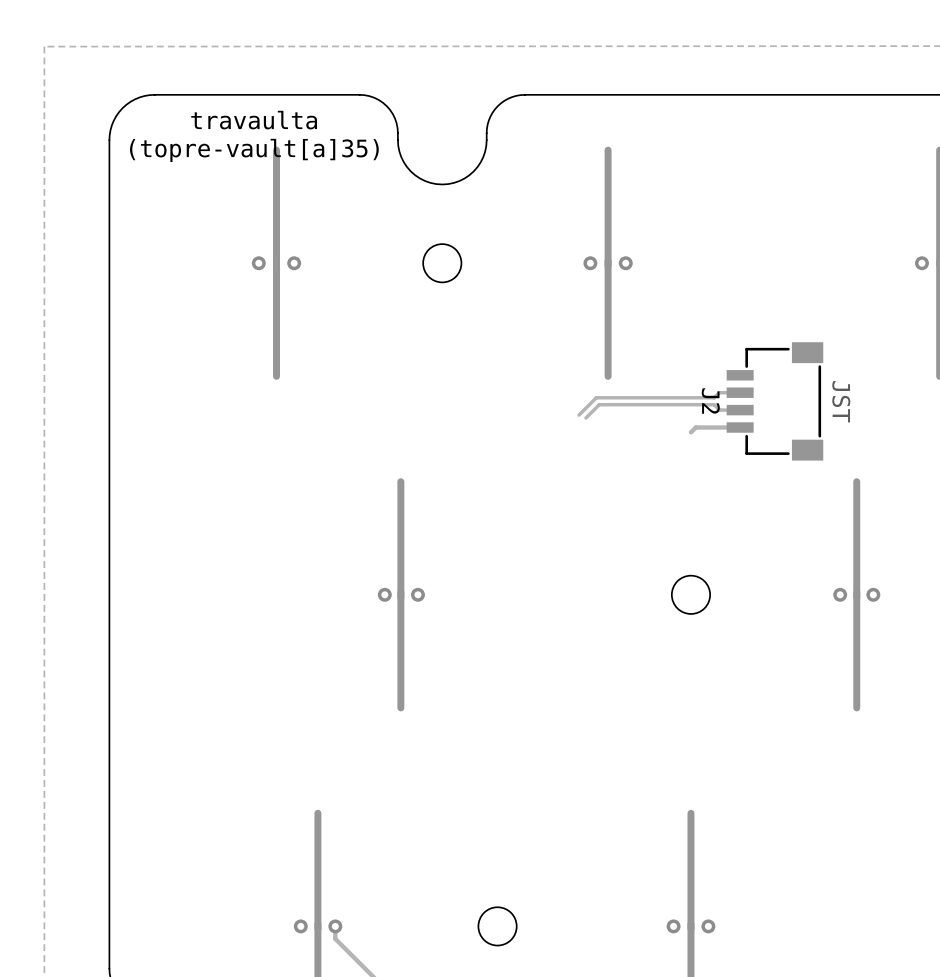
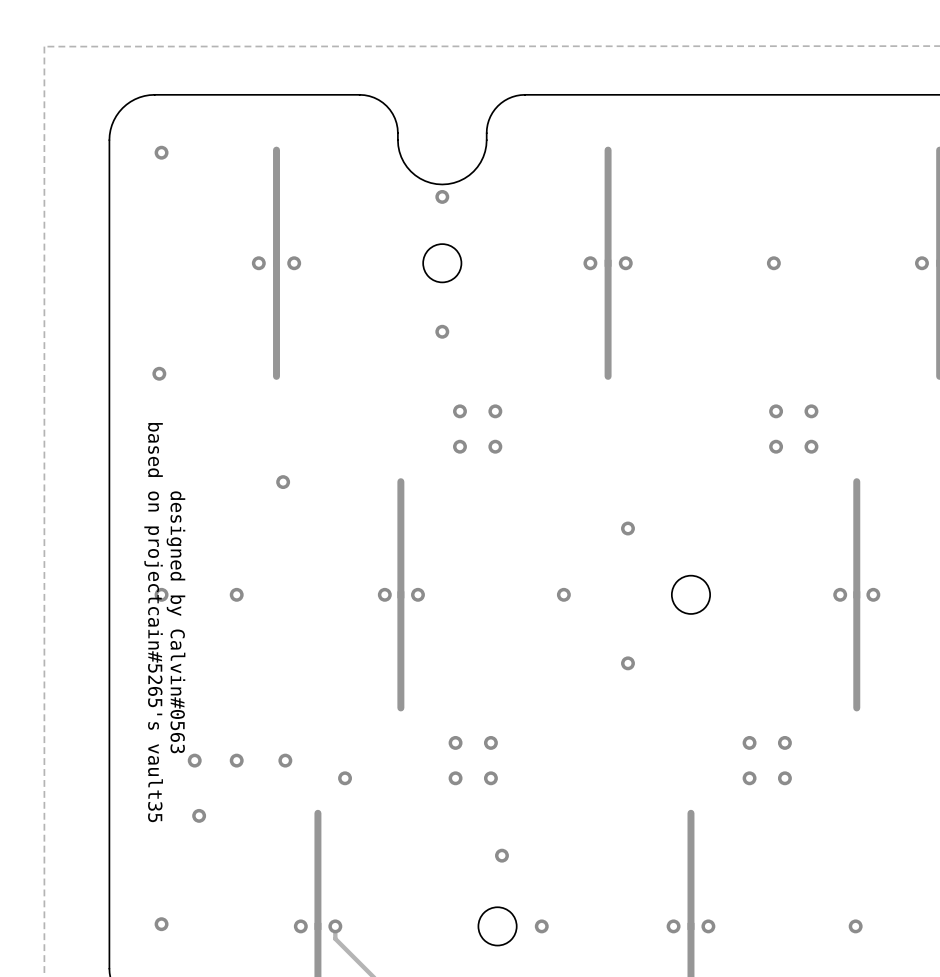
text: travaulta (254, 120) -> none
text: (topre-vault[a]35) (254, 150) -> none
via: none -> (161, 152)
via: none -> (442, 196)
via: none -> (773, 263)
via: none -> (442, 331)
via: none -> (159, 373)
track: (740, 392) (719, 392) (714, 397) (596, 397) (579, 415) -> none
J2: JST (774, 401) -> none
track: (740, 410) (719, 410) (714, 404) (599, 404) (585, 417) -> none
via: none -> (459, 411)
via: none -> (495, 411)
via: none -> (776, 411)
via: none -> (811, 411)
track: (740, 427) (695, 427) (690, 432) -> none
via: none -> (459, 446)
via: none -> (495, 446)
via: none -> (776, 446)
via: none -> (811, 446)
via: none -> (283, 482)
via: none -> (627, 528)
via: none -> (161, 594)
via: none -> (236, 594)
via: none -> (563, 594)
text: none -> based on projectcain#5265's vault35 (153, 622)
text: none -> designed by Calvin#0563 (176, 622)
via: none -> (627, 663)
via: none -> (455, 742)
via: none -> (490, 742)
via: none -> (749, 742)
via: none -> (784, 742)
via: none -> (194, 760)
via: none -> (236, 760)
via: none -> (285, 760)
via: none -> (345, 778)
via: none -> (455, 778)
via: none -> (490, 778)
via: none -> (749, 778)
via: none -> (784, 778)
via: none -> (199, 815)
via: none -> (501, 855)
via: none -> (161, 924)
via: none -> (541, 926)
via: none -> (855, 926)

